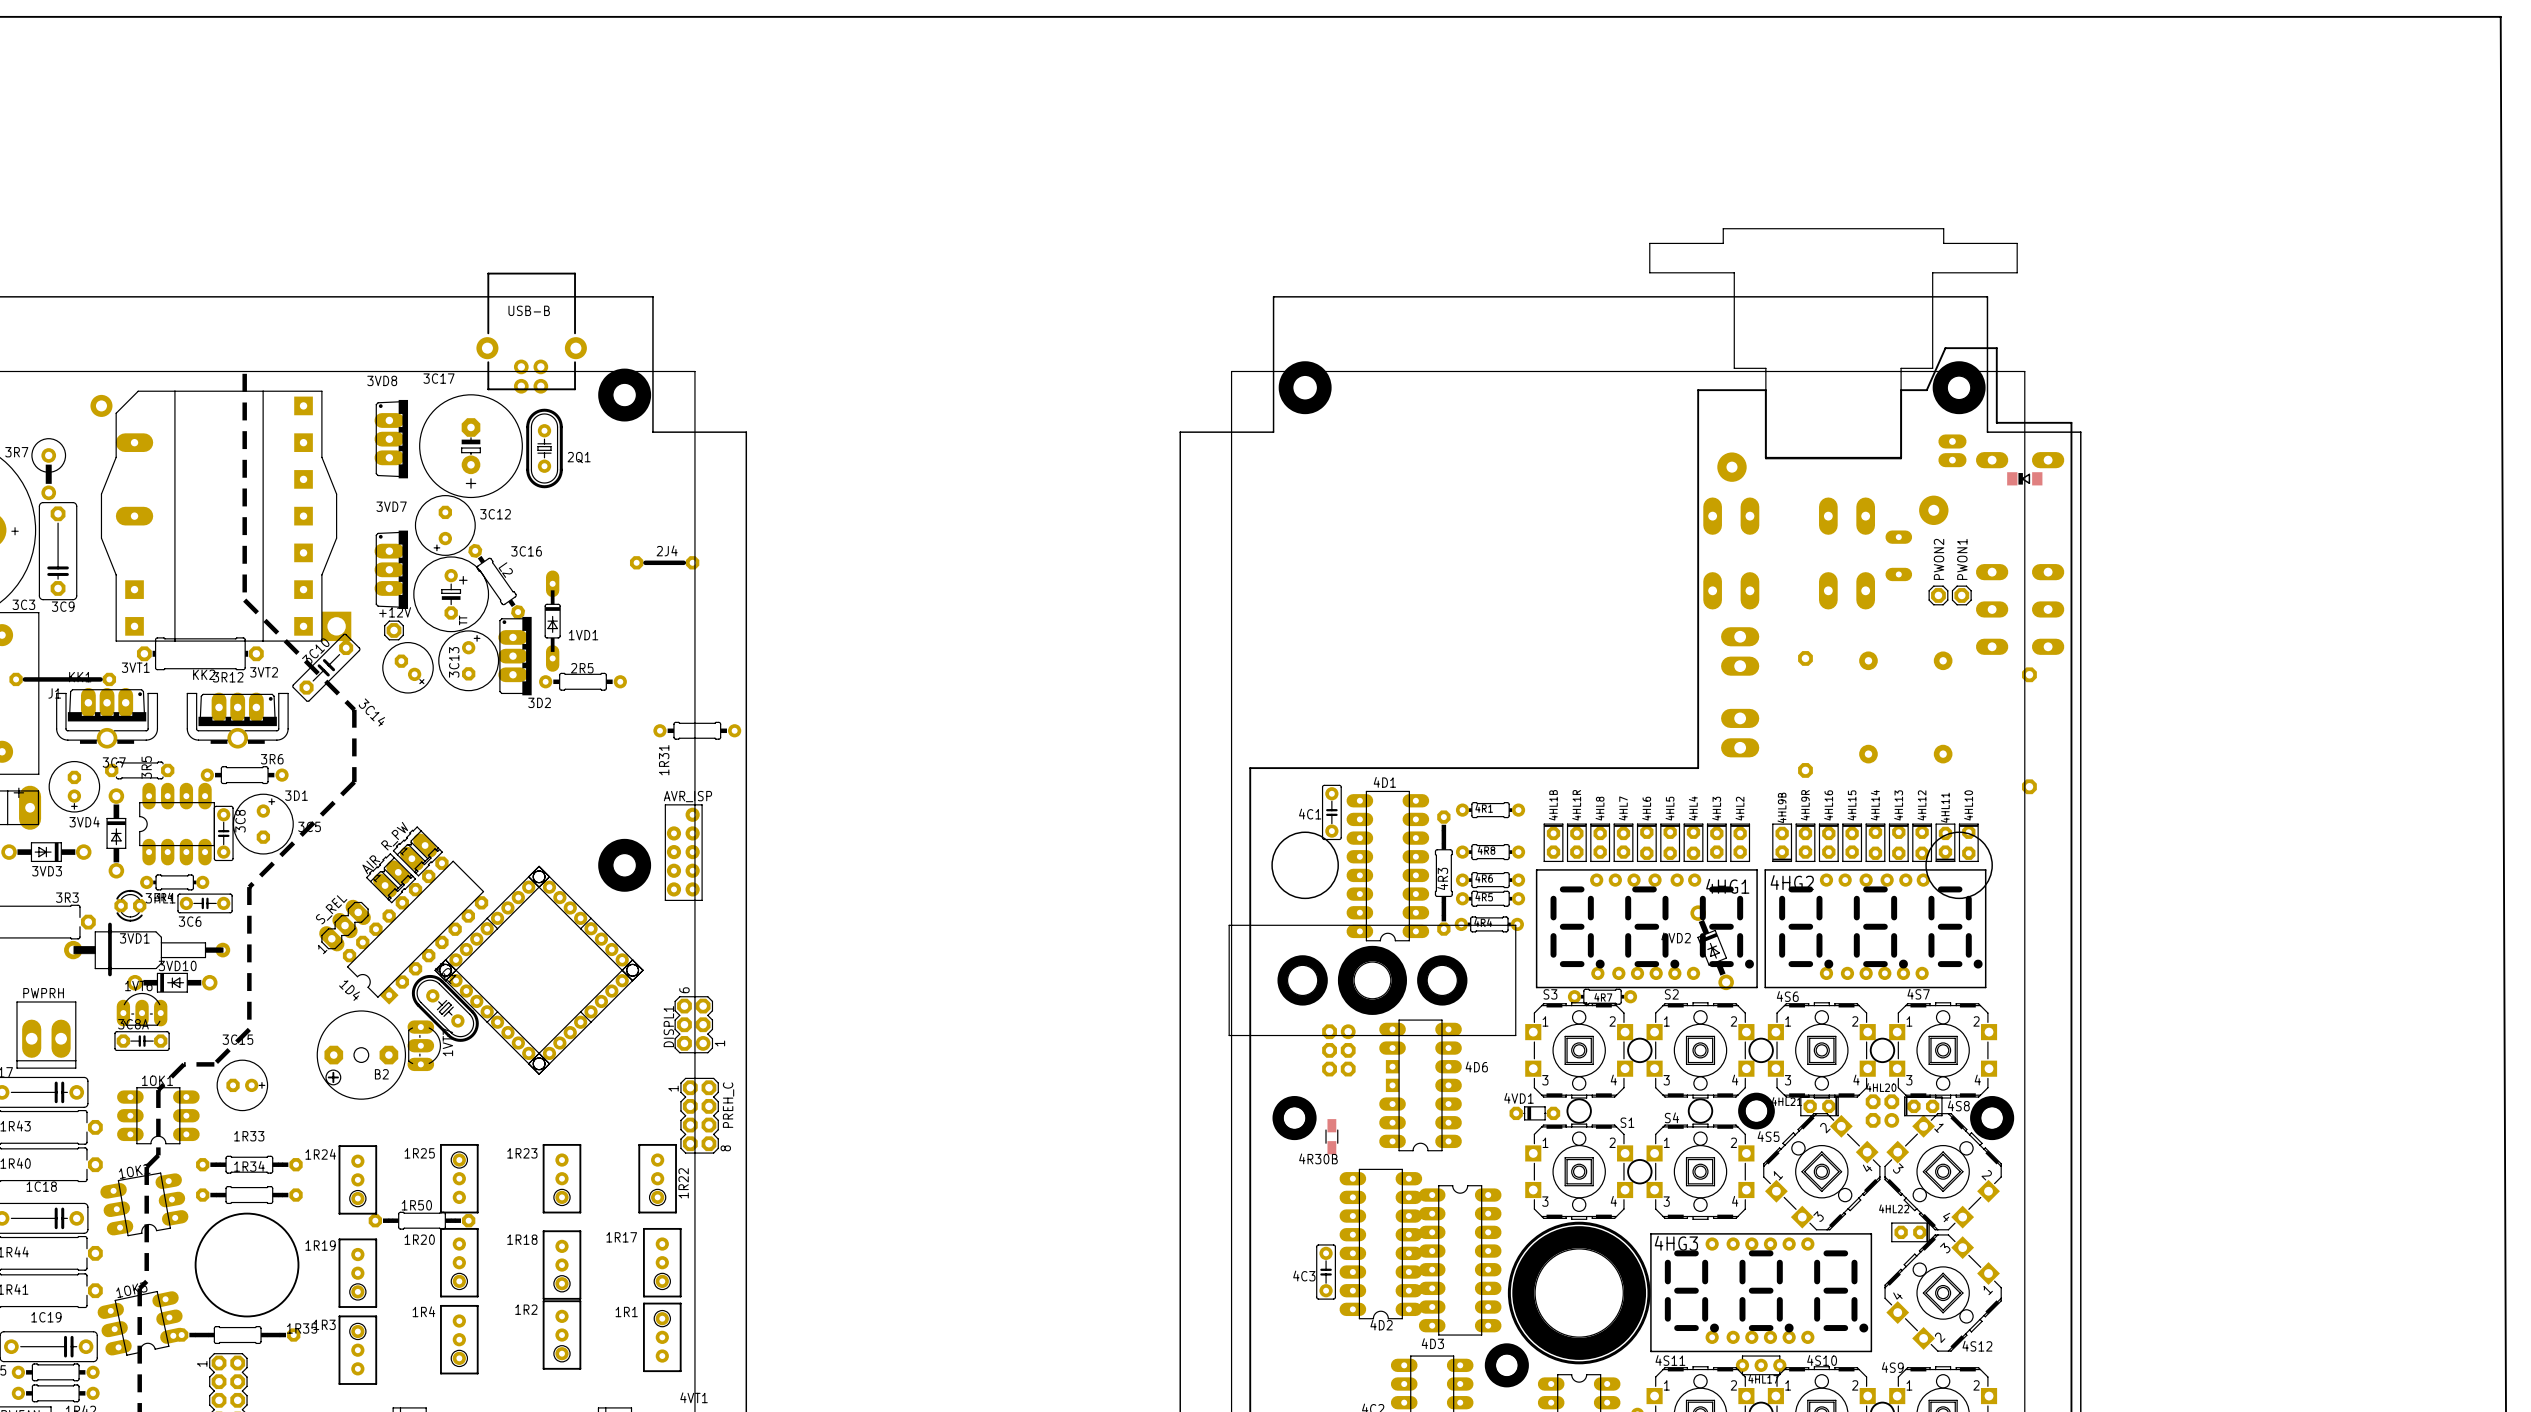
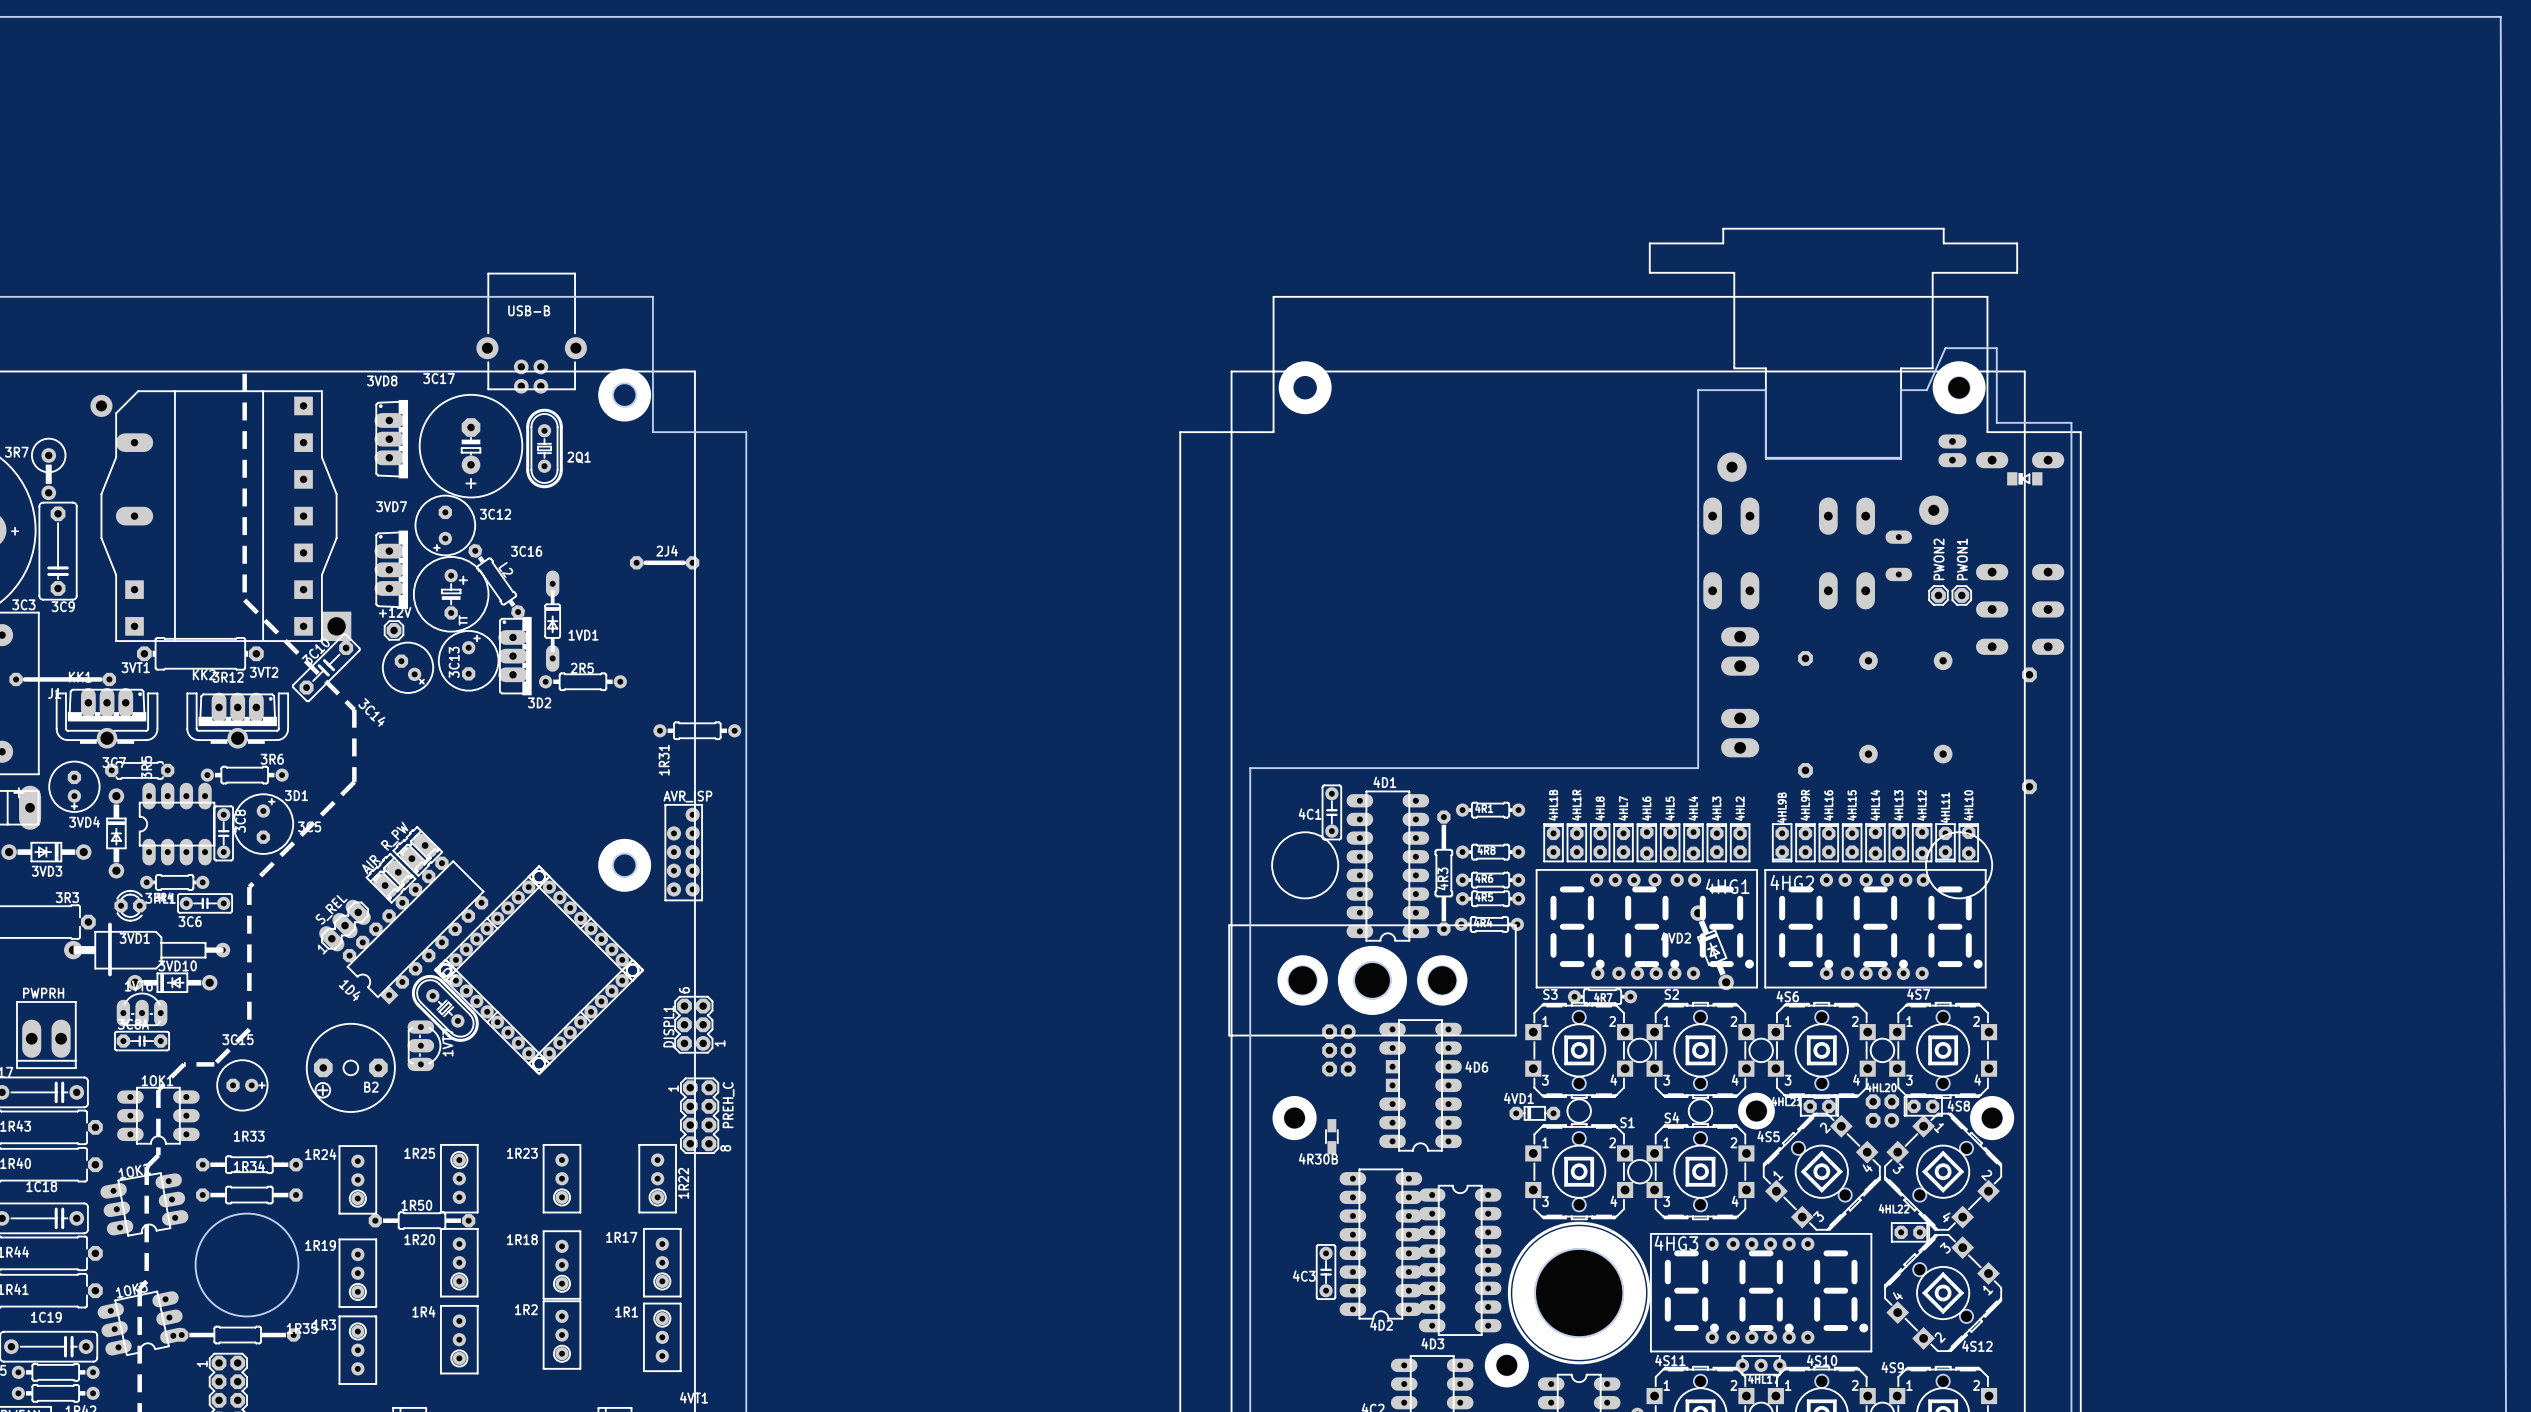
B2 footprint: [316, 1010, 407, 1100] -> [306, 1023, 396, 1113]

